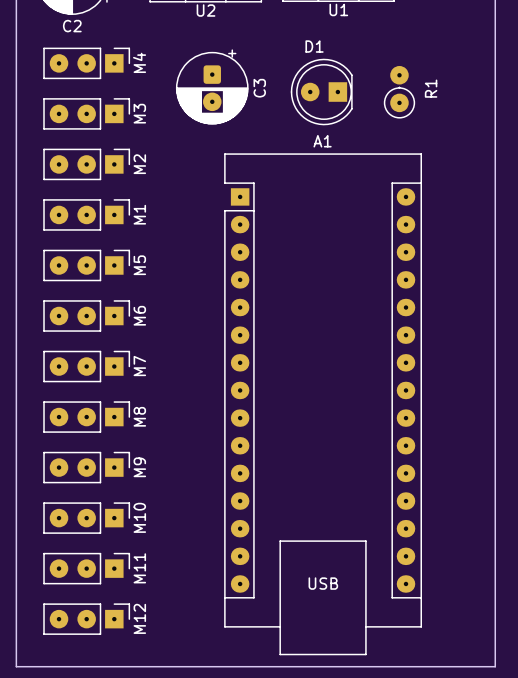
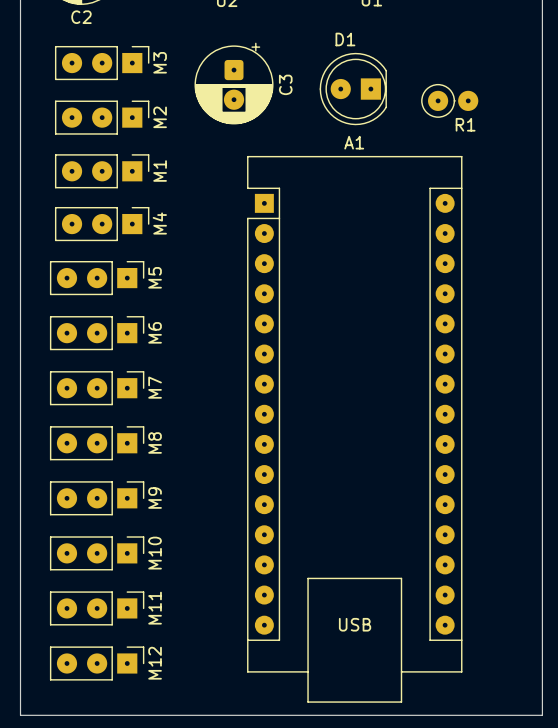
M4 position: (86, 63) -> (102, 224)
R1 rotation: 0° (399, 92) -> 90° clockwise (449, 100)
M3 position: (86, 113) -> (102, 63)
A1 footprint: [224, 153, 422, 656] -> [247, 155, 463, 703]
M2 position: (86, 164) -> (102, 117)
M1 position: (86, 214) -> (102, 171)

